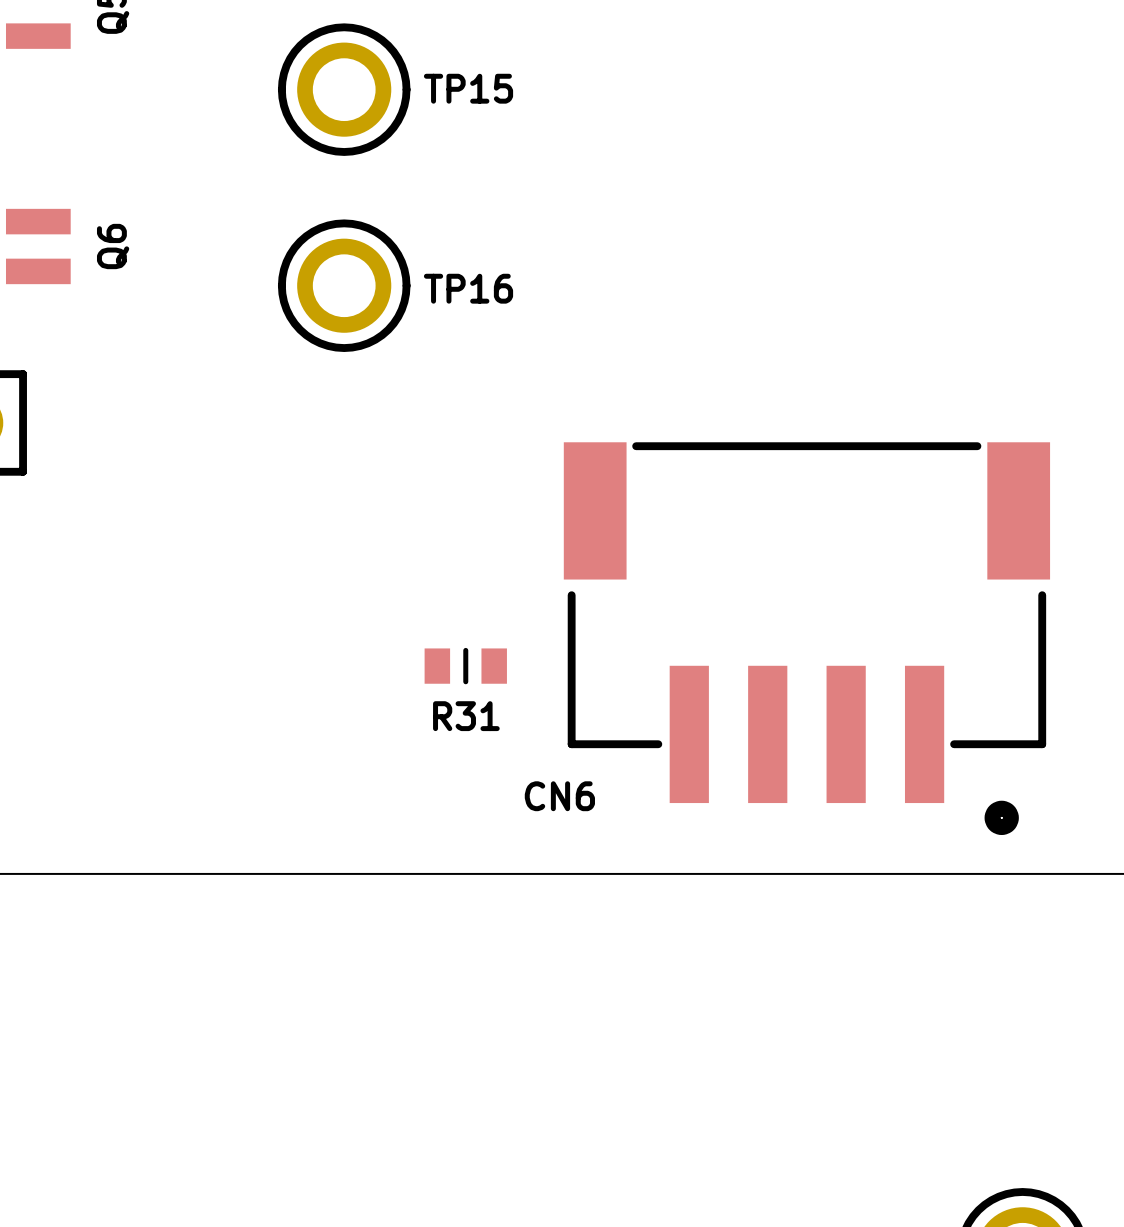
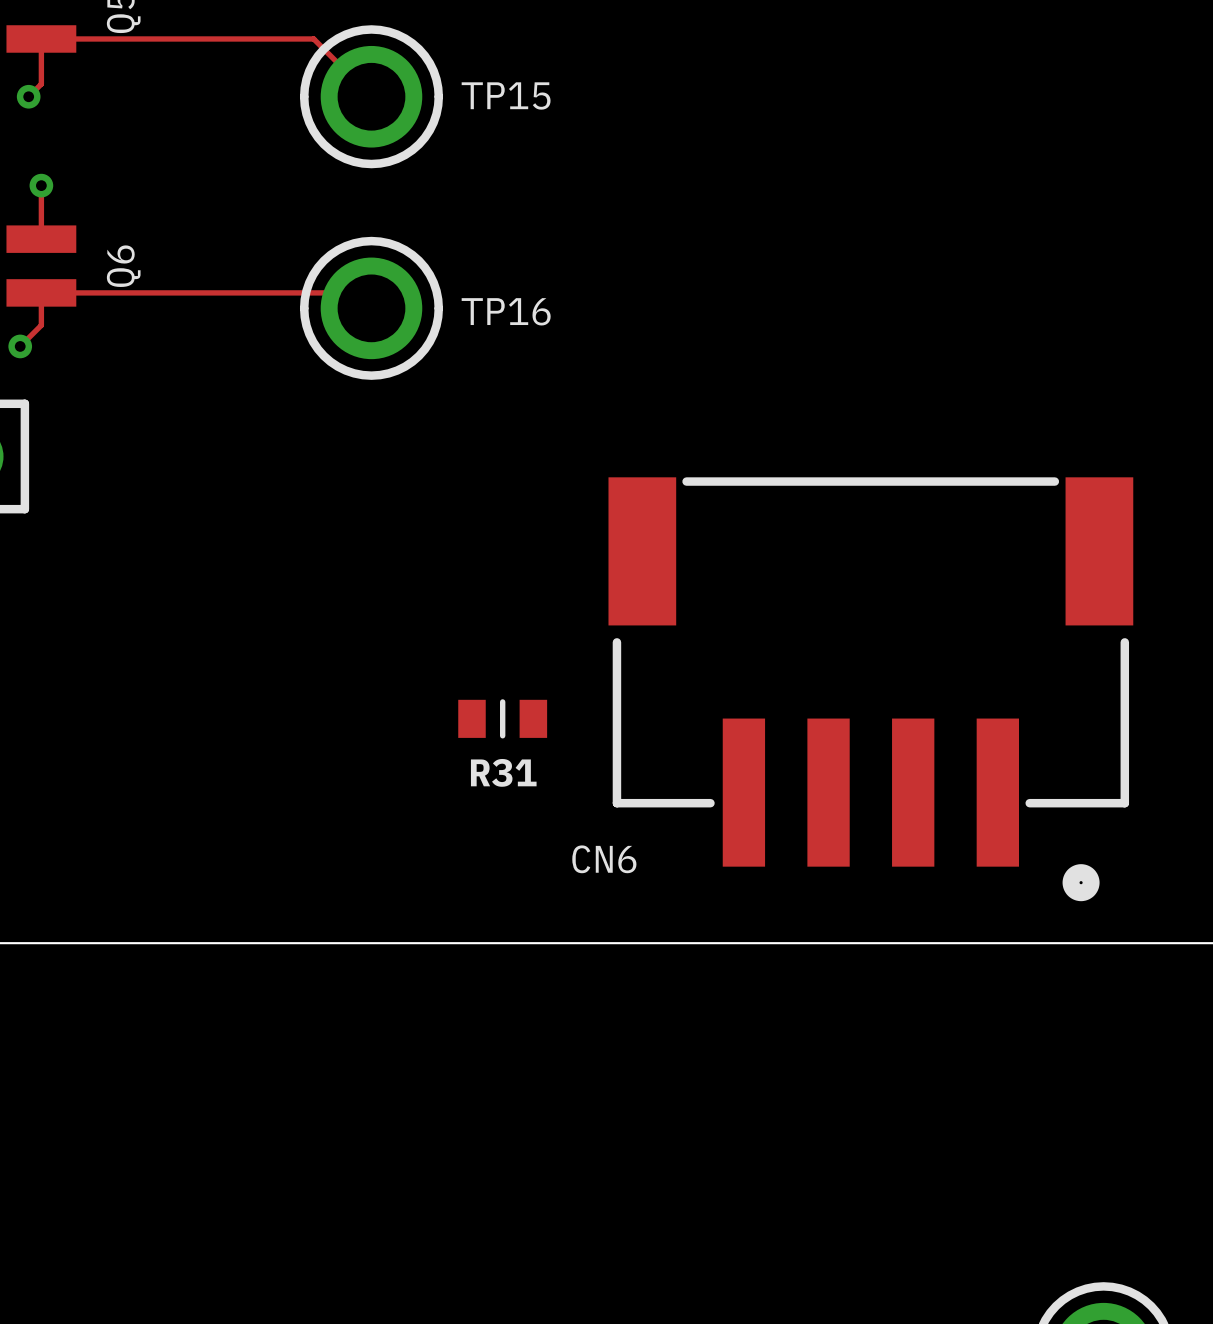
track: none -> (28, 96) (41, 84) (41, 38) (313, 38) (371, 96)
via: none -> (28, 96)
track: none -> (41, 185) (41, 239)
via: none -> (41, 185)
track: none -> (371, 308) (356, 292) (41, 292) (41, 325) (20, 346)
via: none -> (20, 346)

